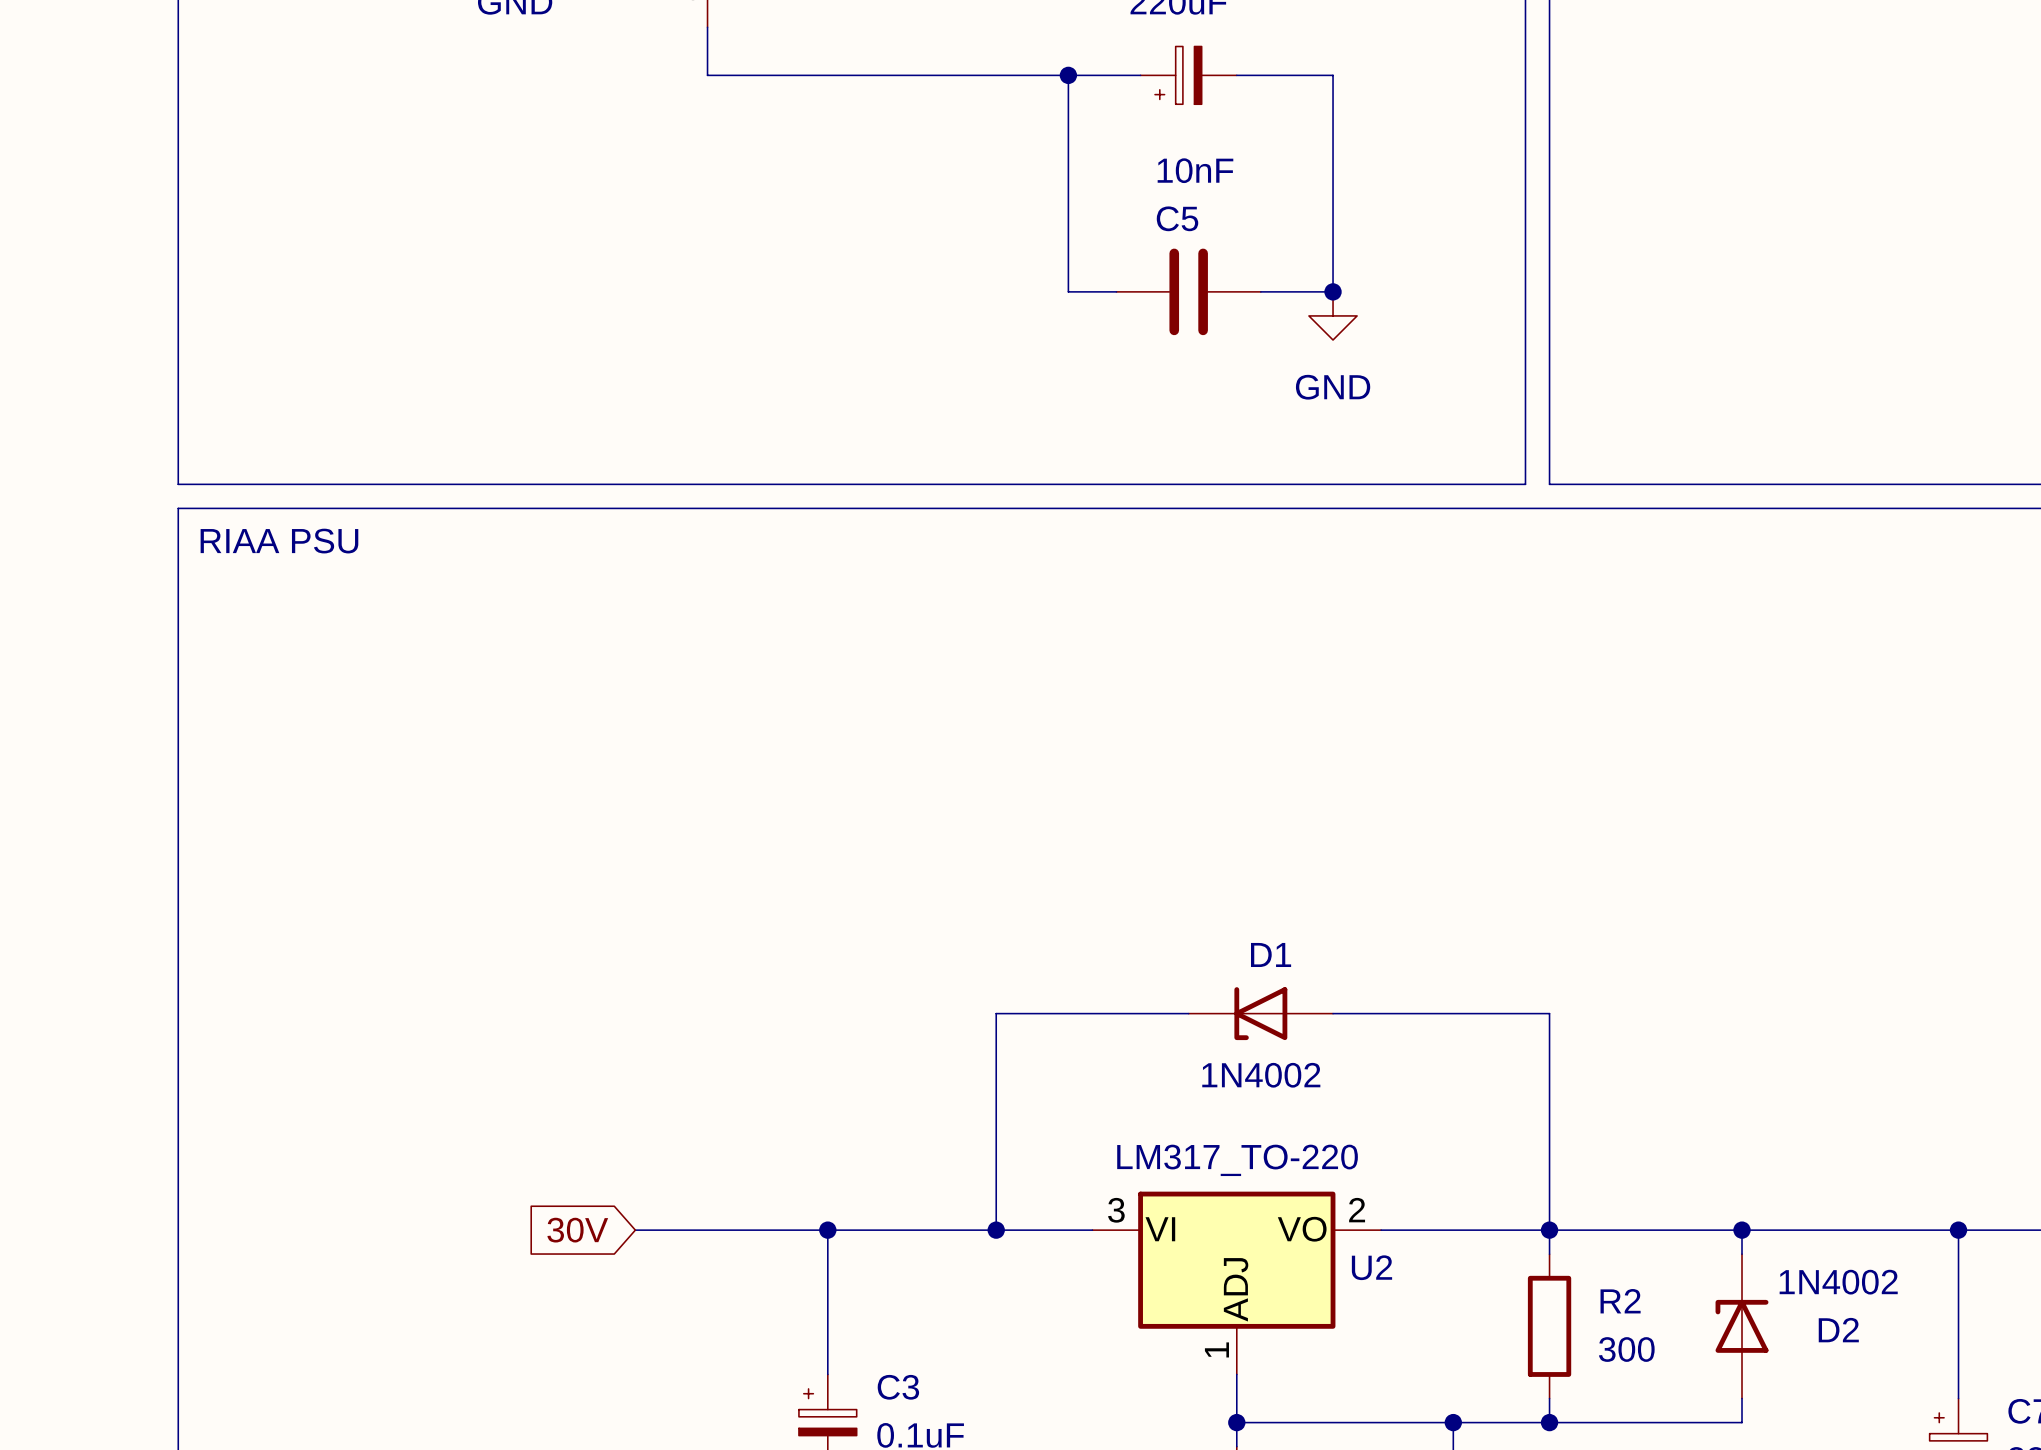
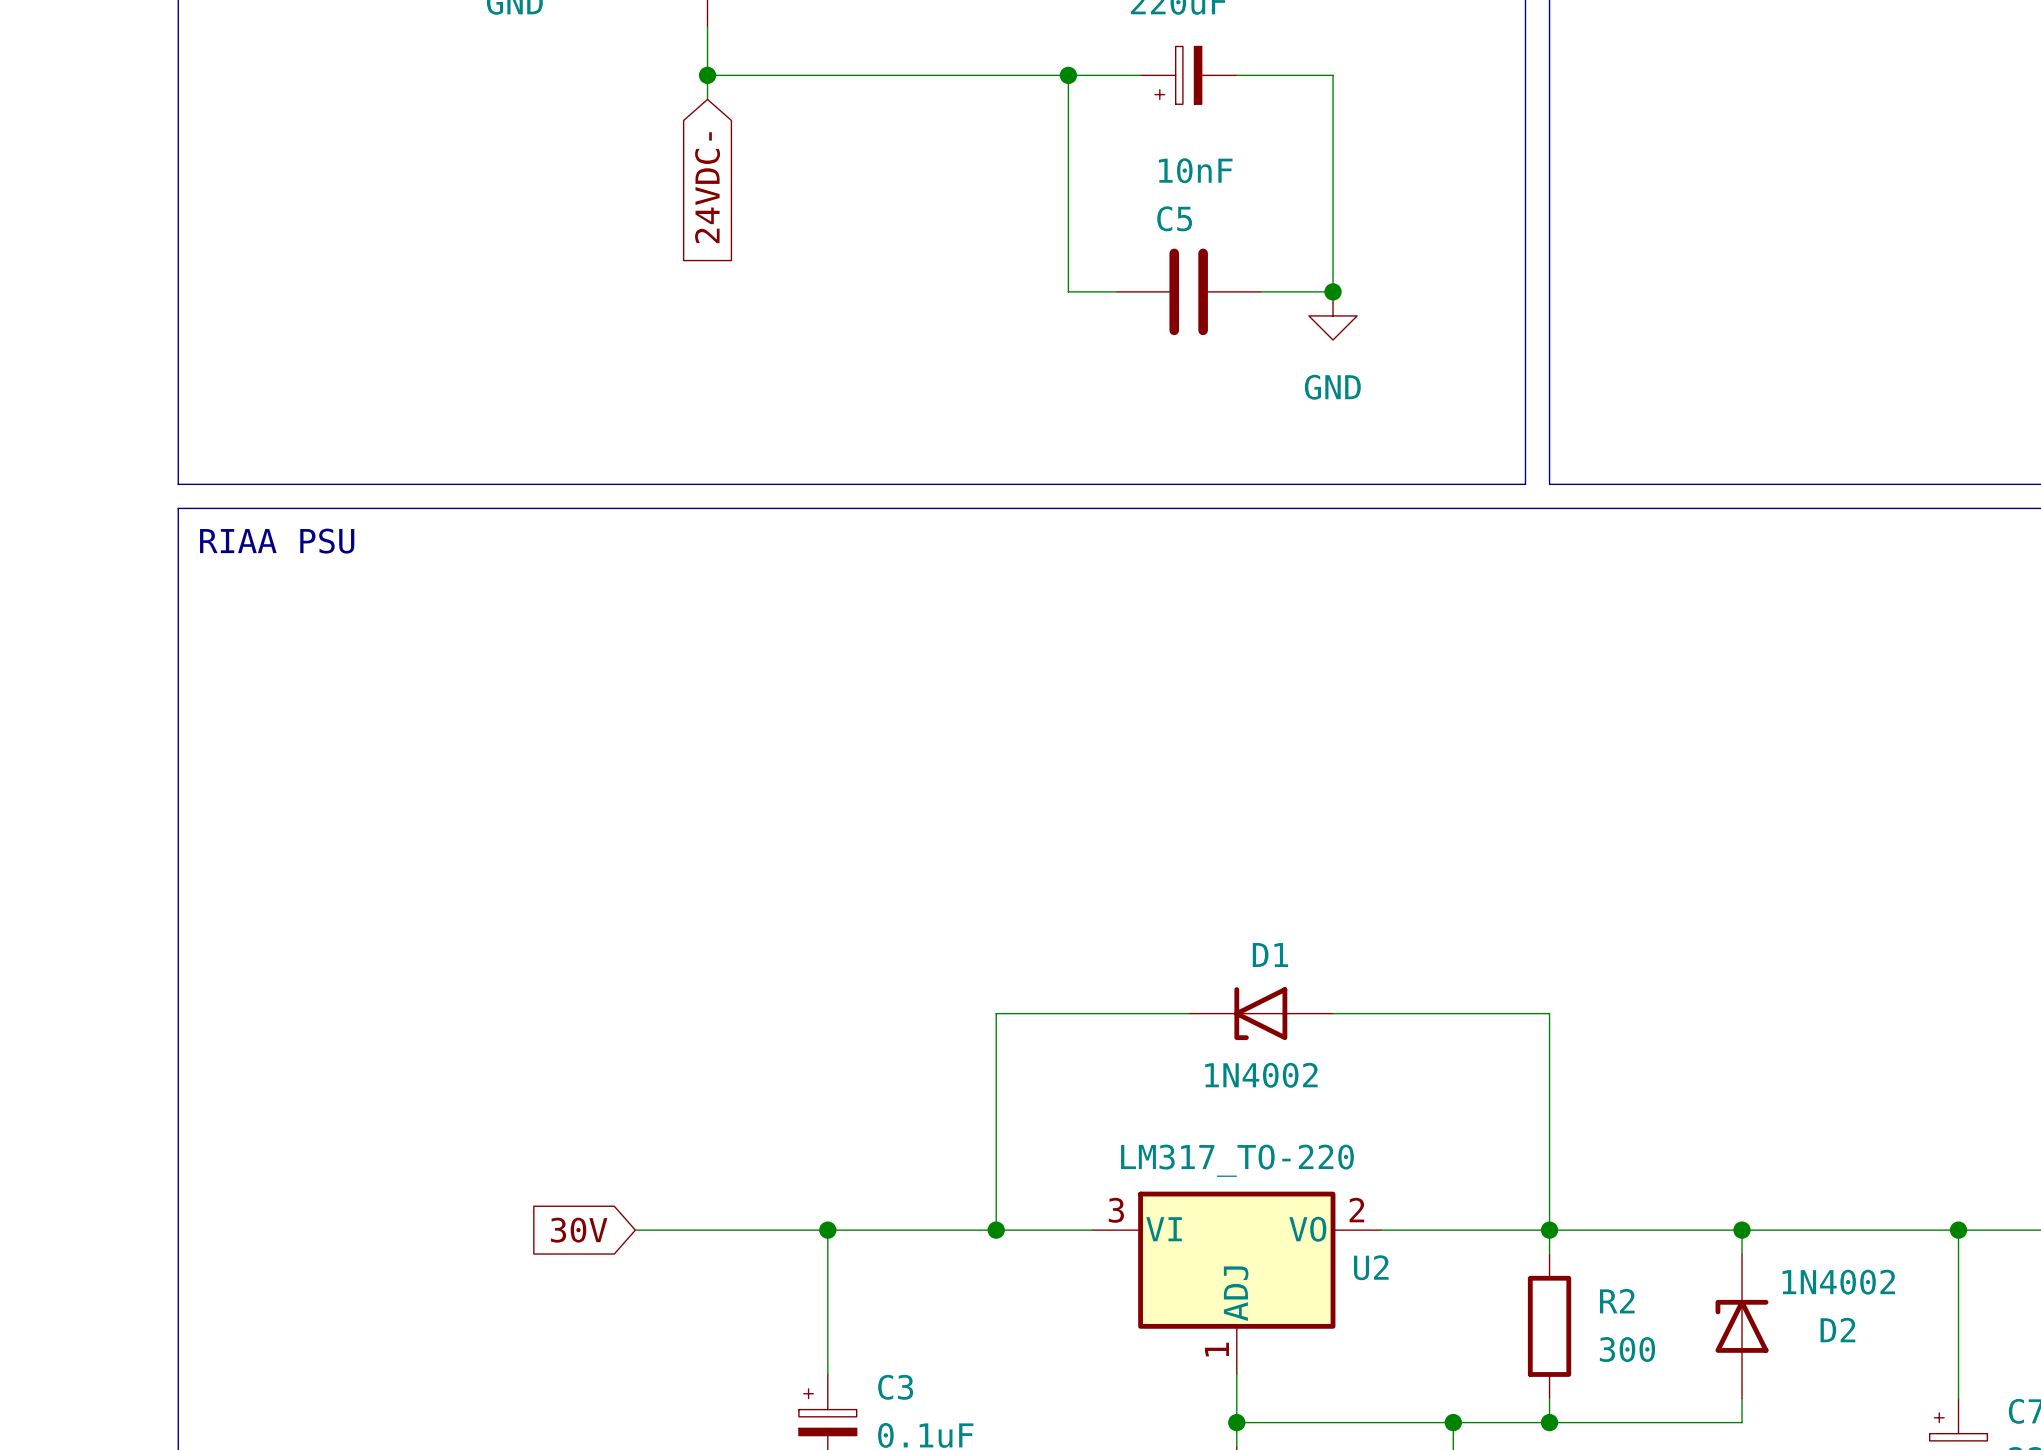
wire: none -> (707, 75) (707, 99)
junction: none -> (707, 75)
global label: none -> 24VDC- (707, 187)

